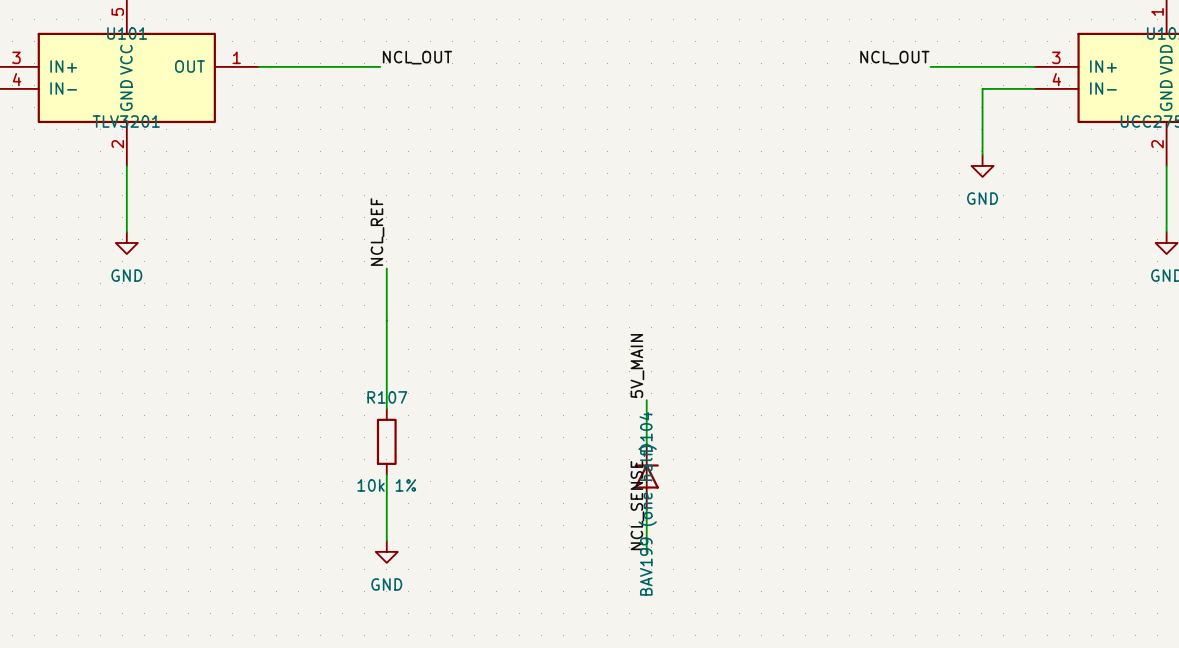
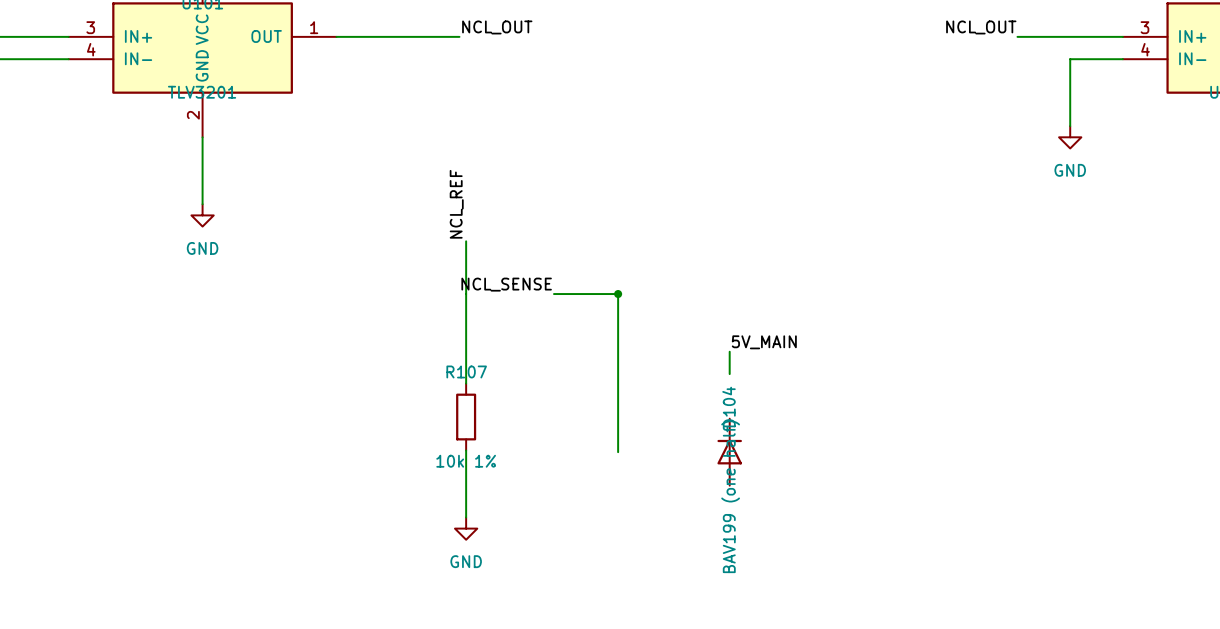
label: none -> NCL_SENSE (506, 284)
wire: none -> (553, 294) (618, 294) (618, 452)
junction: none -> (618, 294)
label rotation: 0° (637, 366) -> 90° clockwise (764, 342)
wire: none -> (729, 351) (729, 374)
wire: (646, 400) (646, 443) -> none
label: NCL_SENSE (637, 505) -> none
wire: (646, 509) (646, 552) -> none

